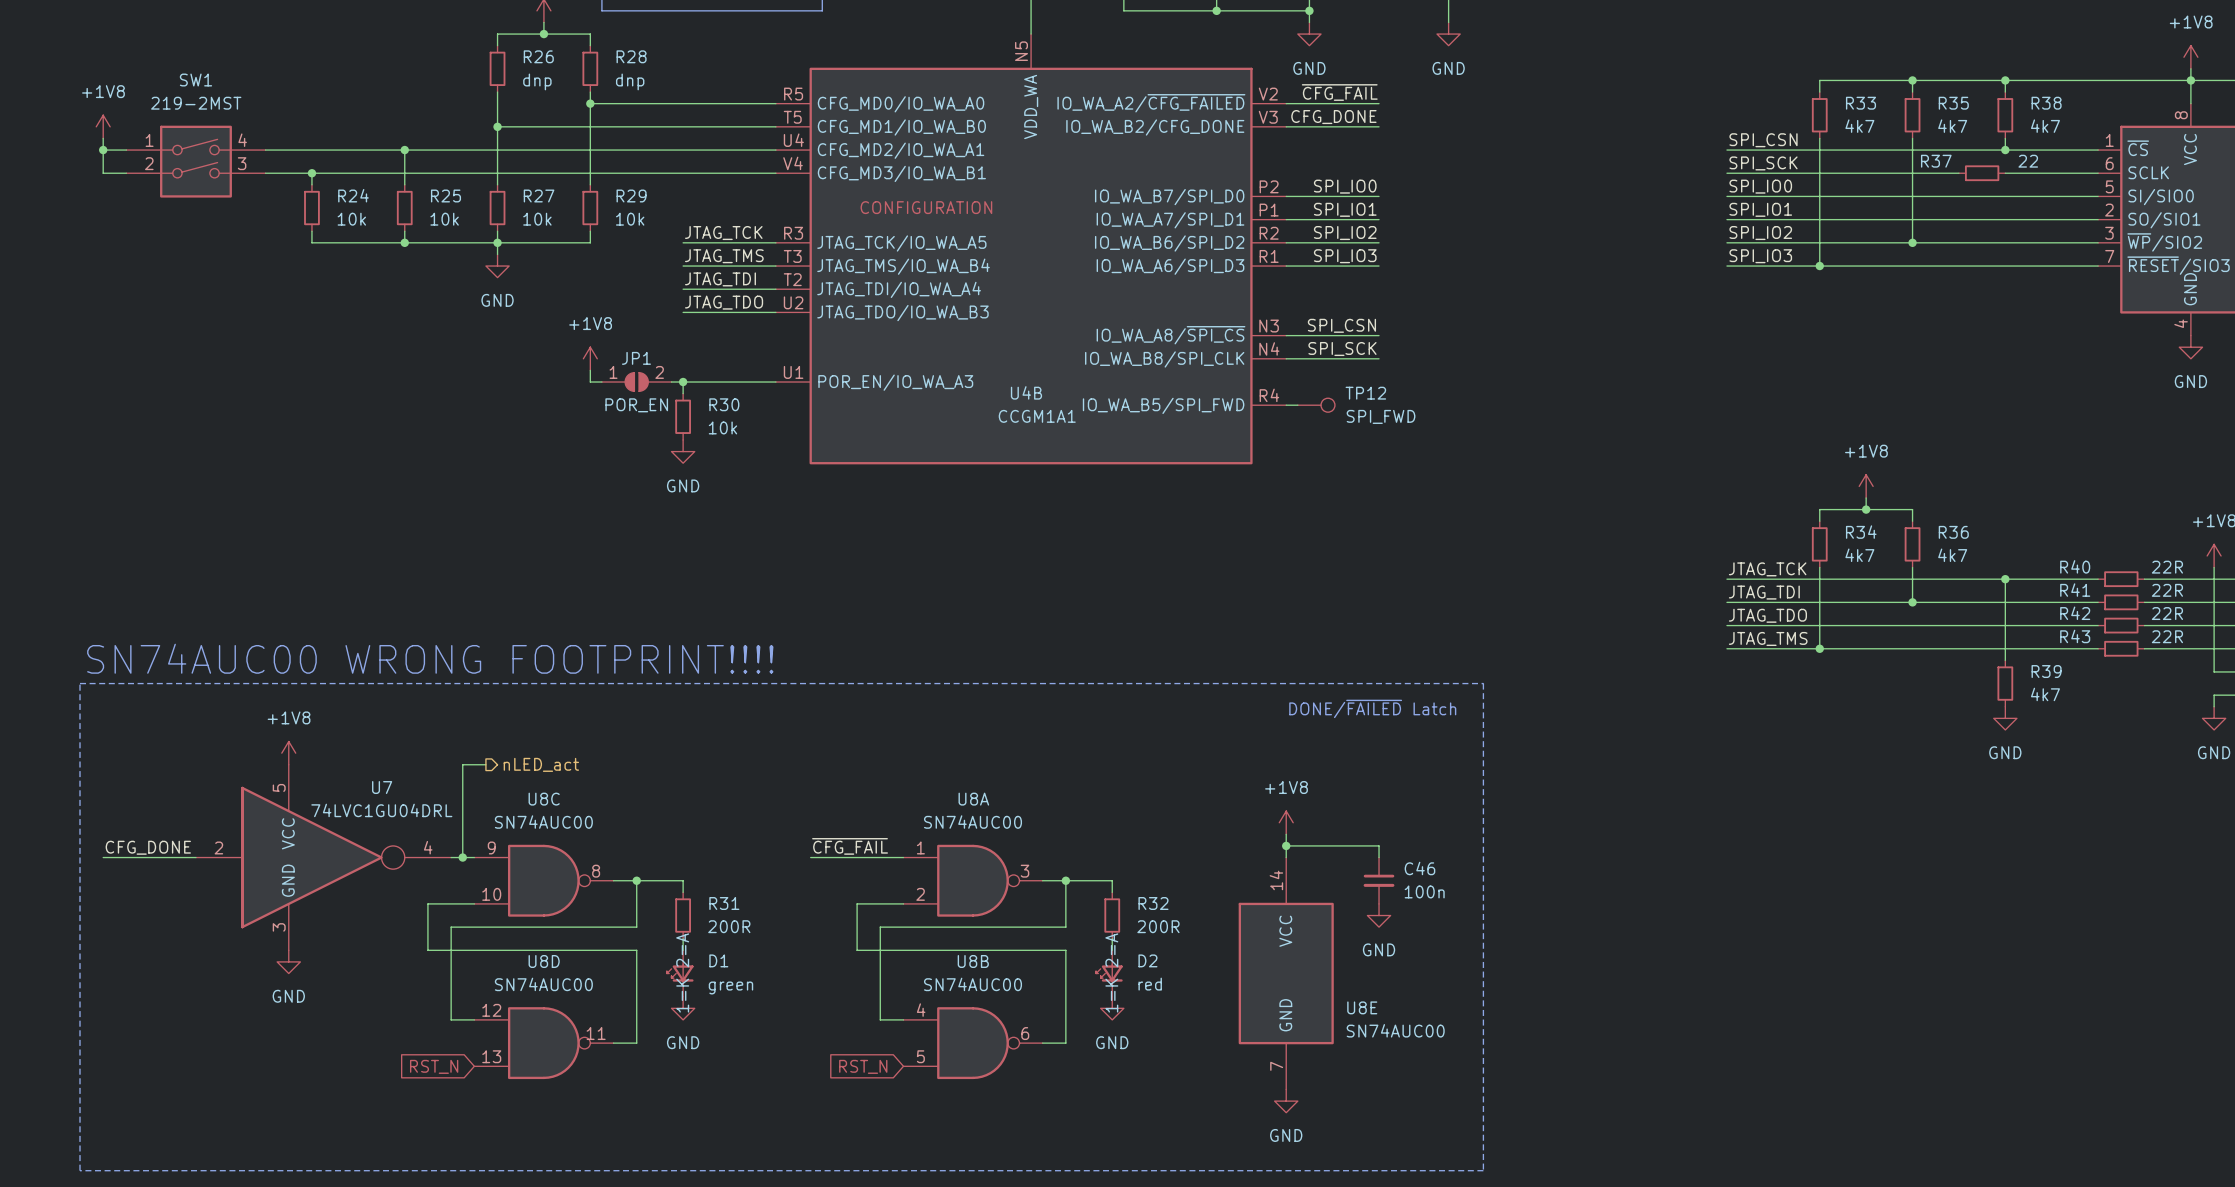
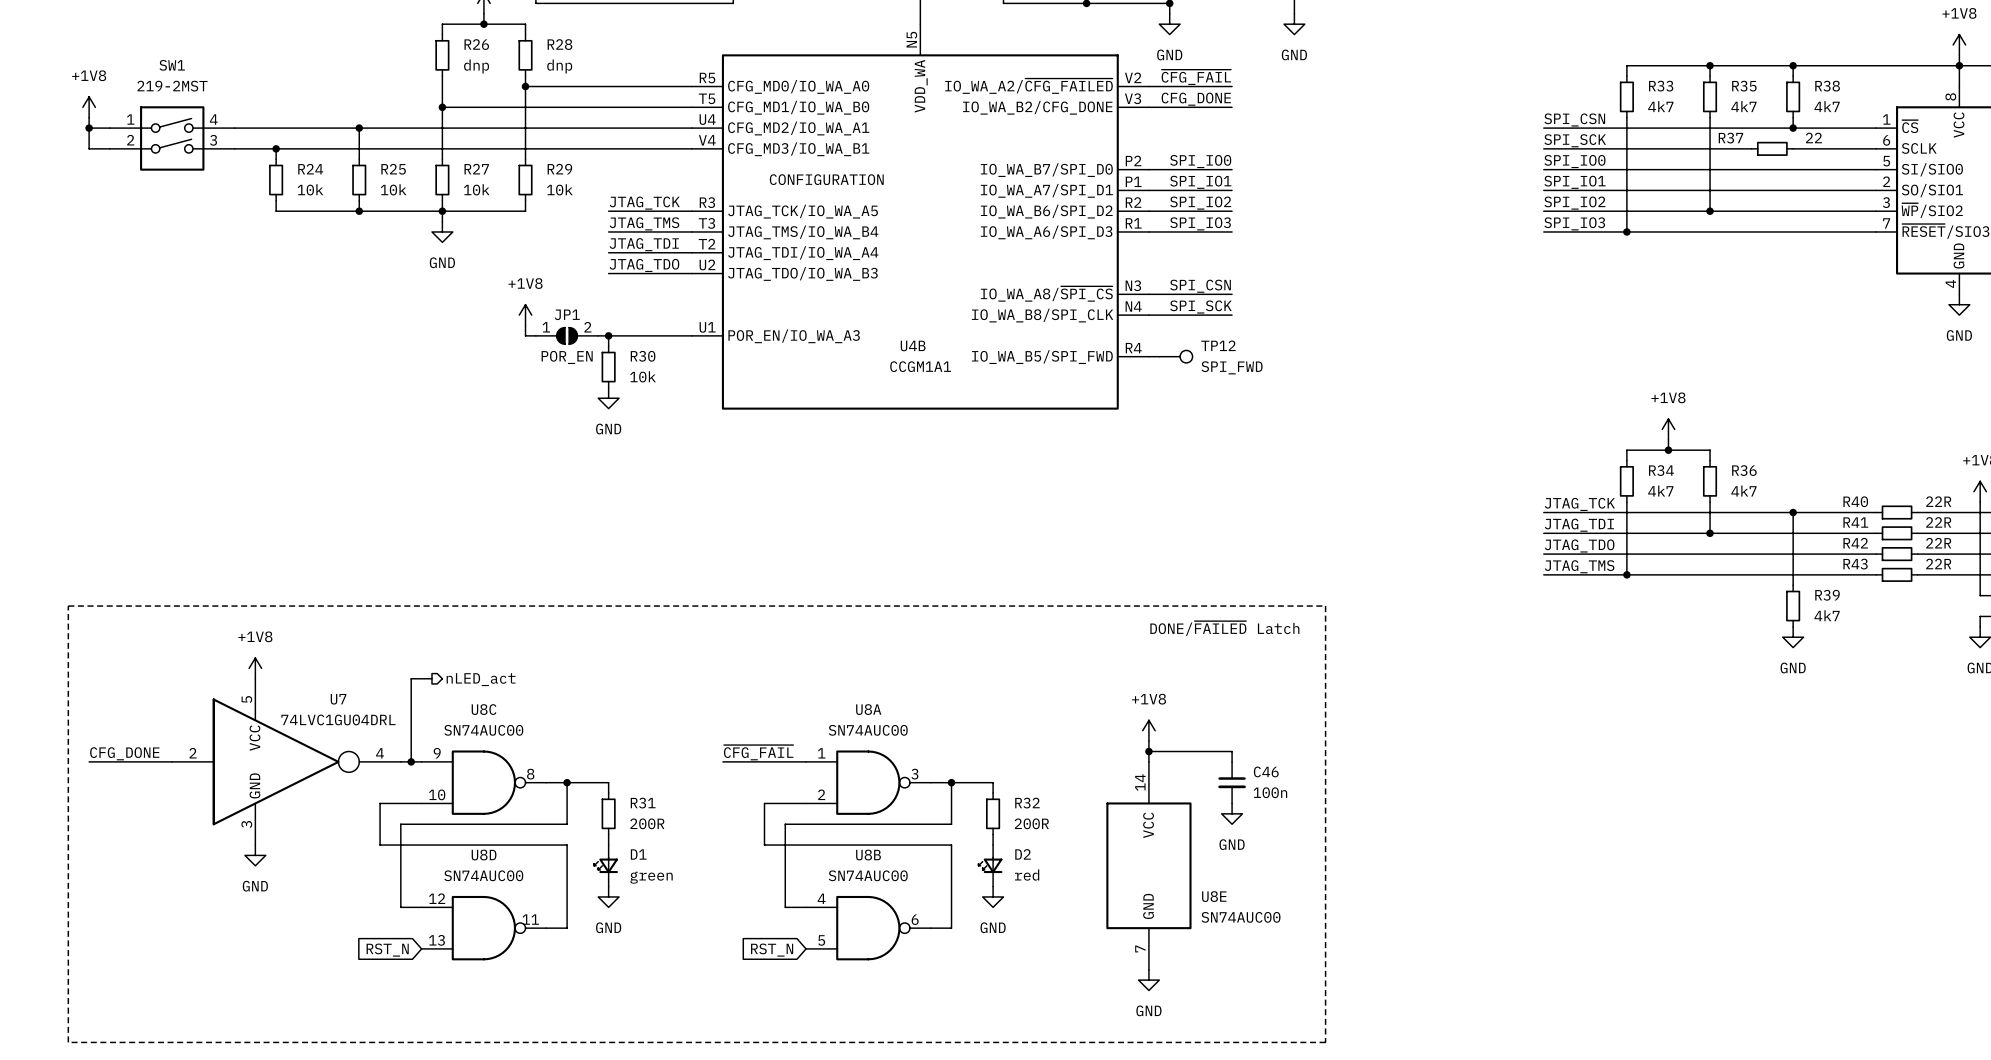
text: SN74AUC00 WRONG FOOTPRINT!!!! (430, 658) -> none
D1 text: 1=K 2=A (682, 972) -> none
D2 text: 1=K 2=A (1111, 972) -> none

